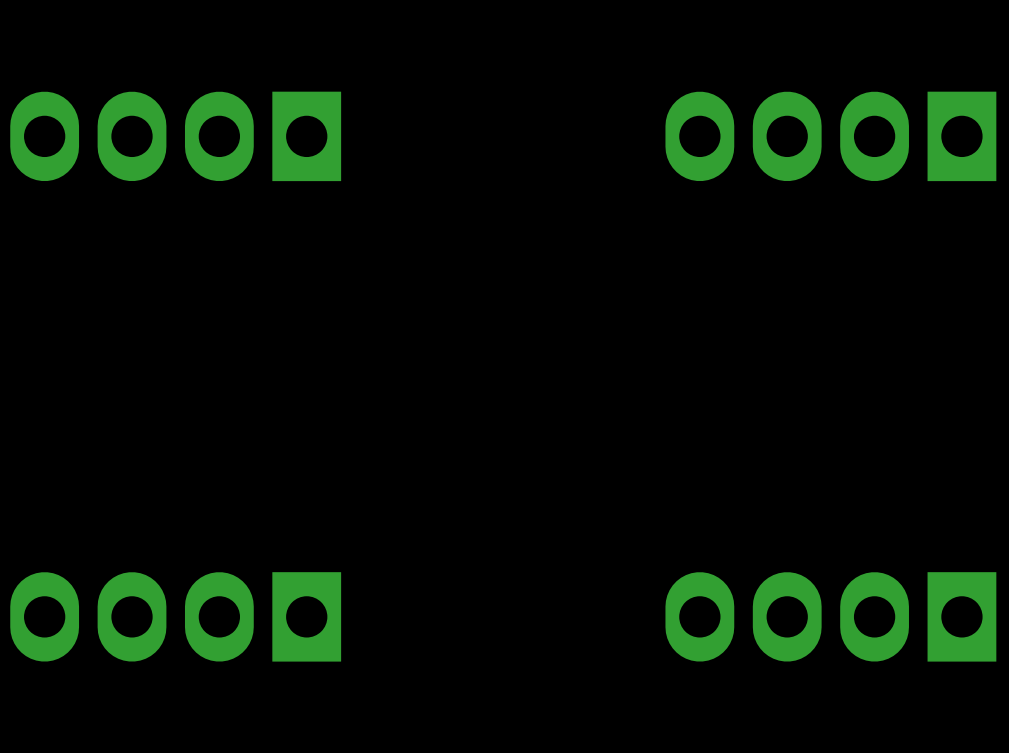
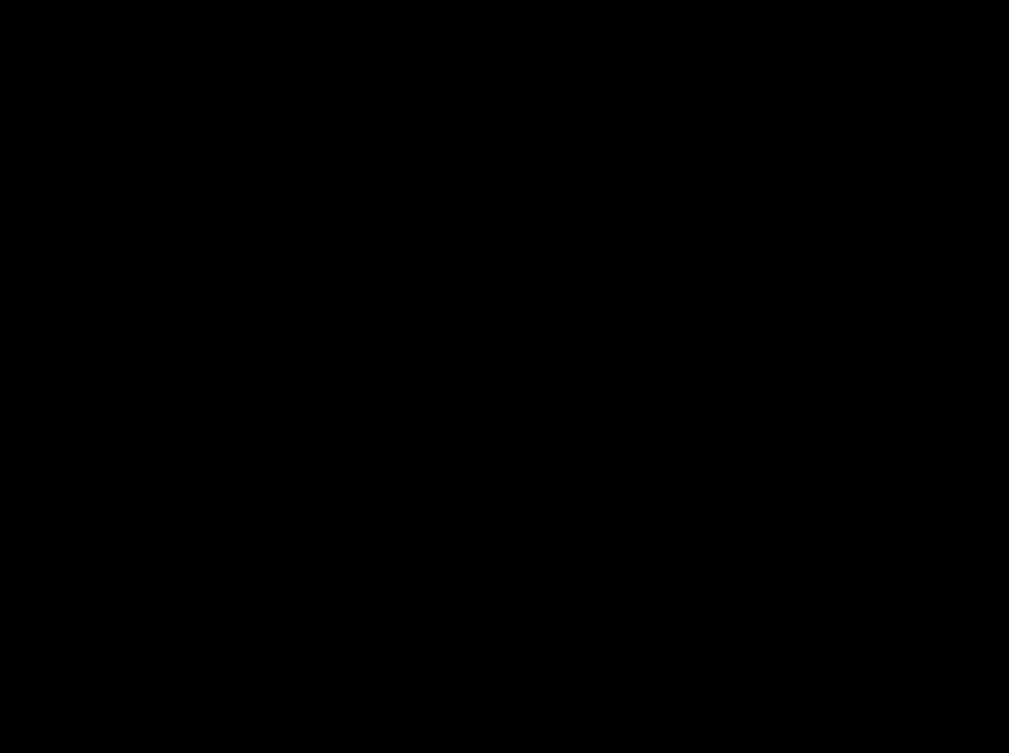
part: (175, 136) -> none
part: (830, 136) -> none
part: (175, 616) -> none
part: (830, 616) -> none

